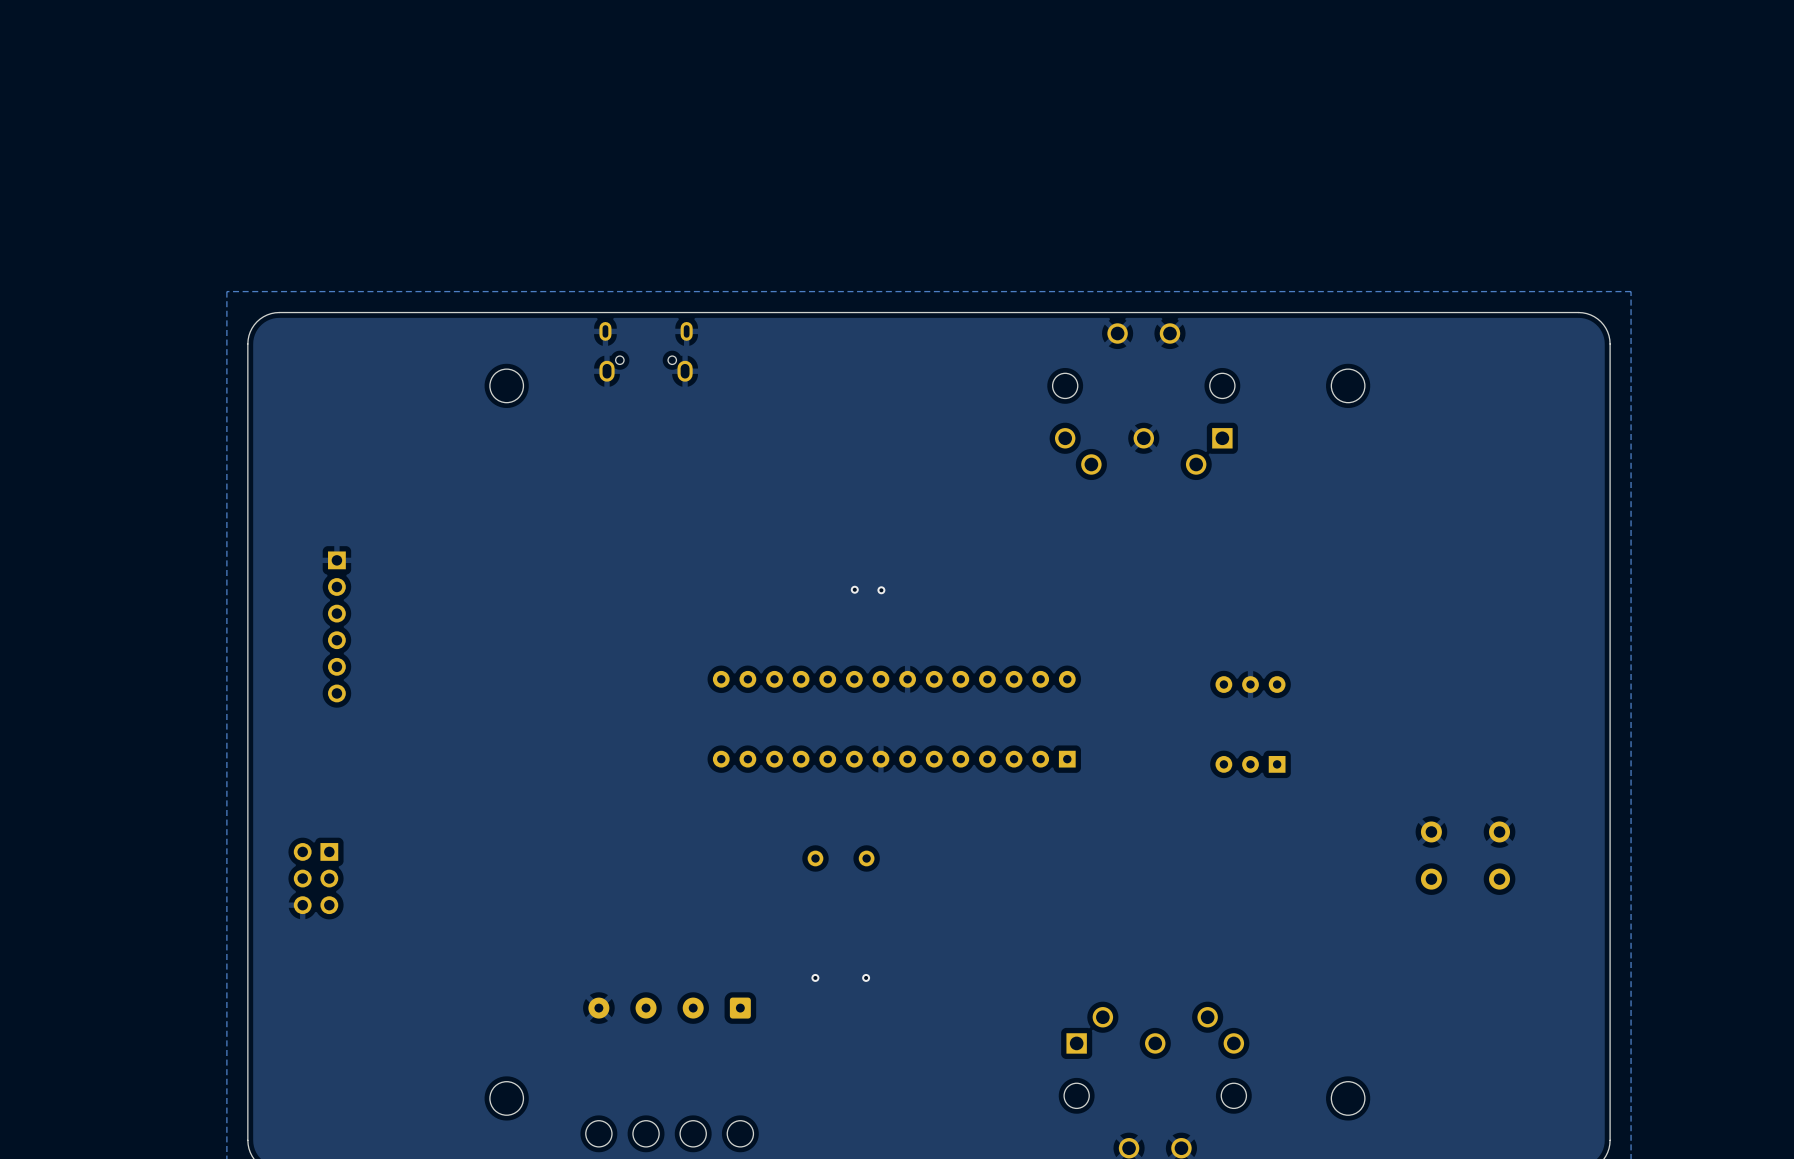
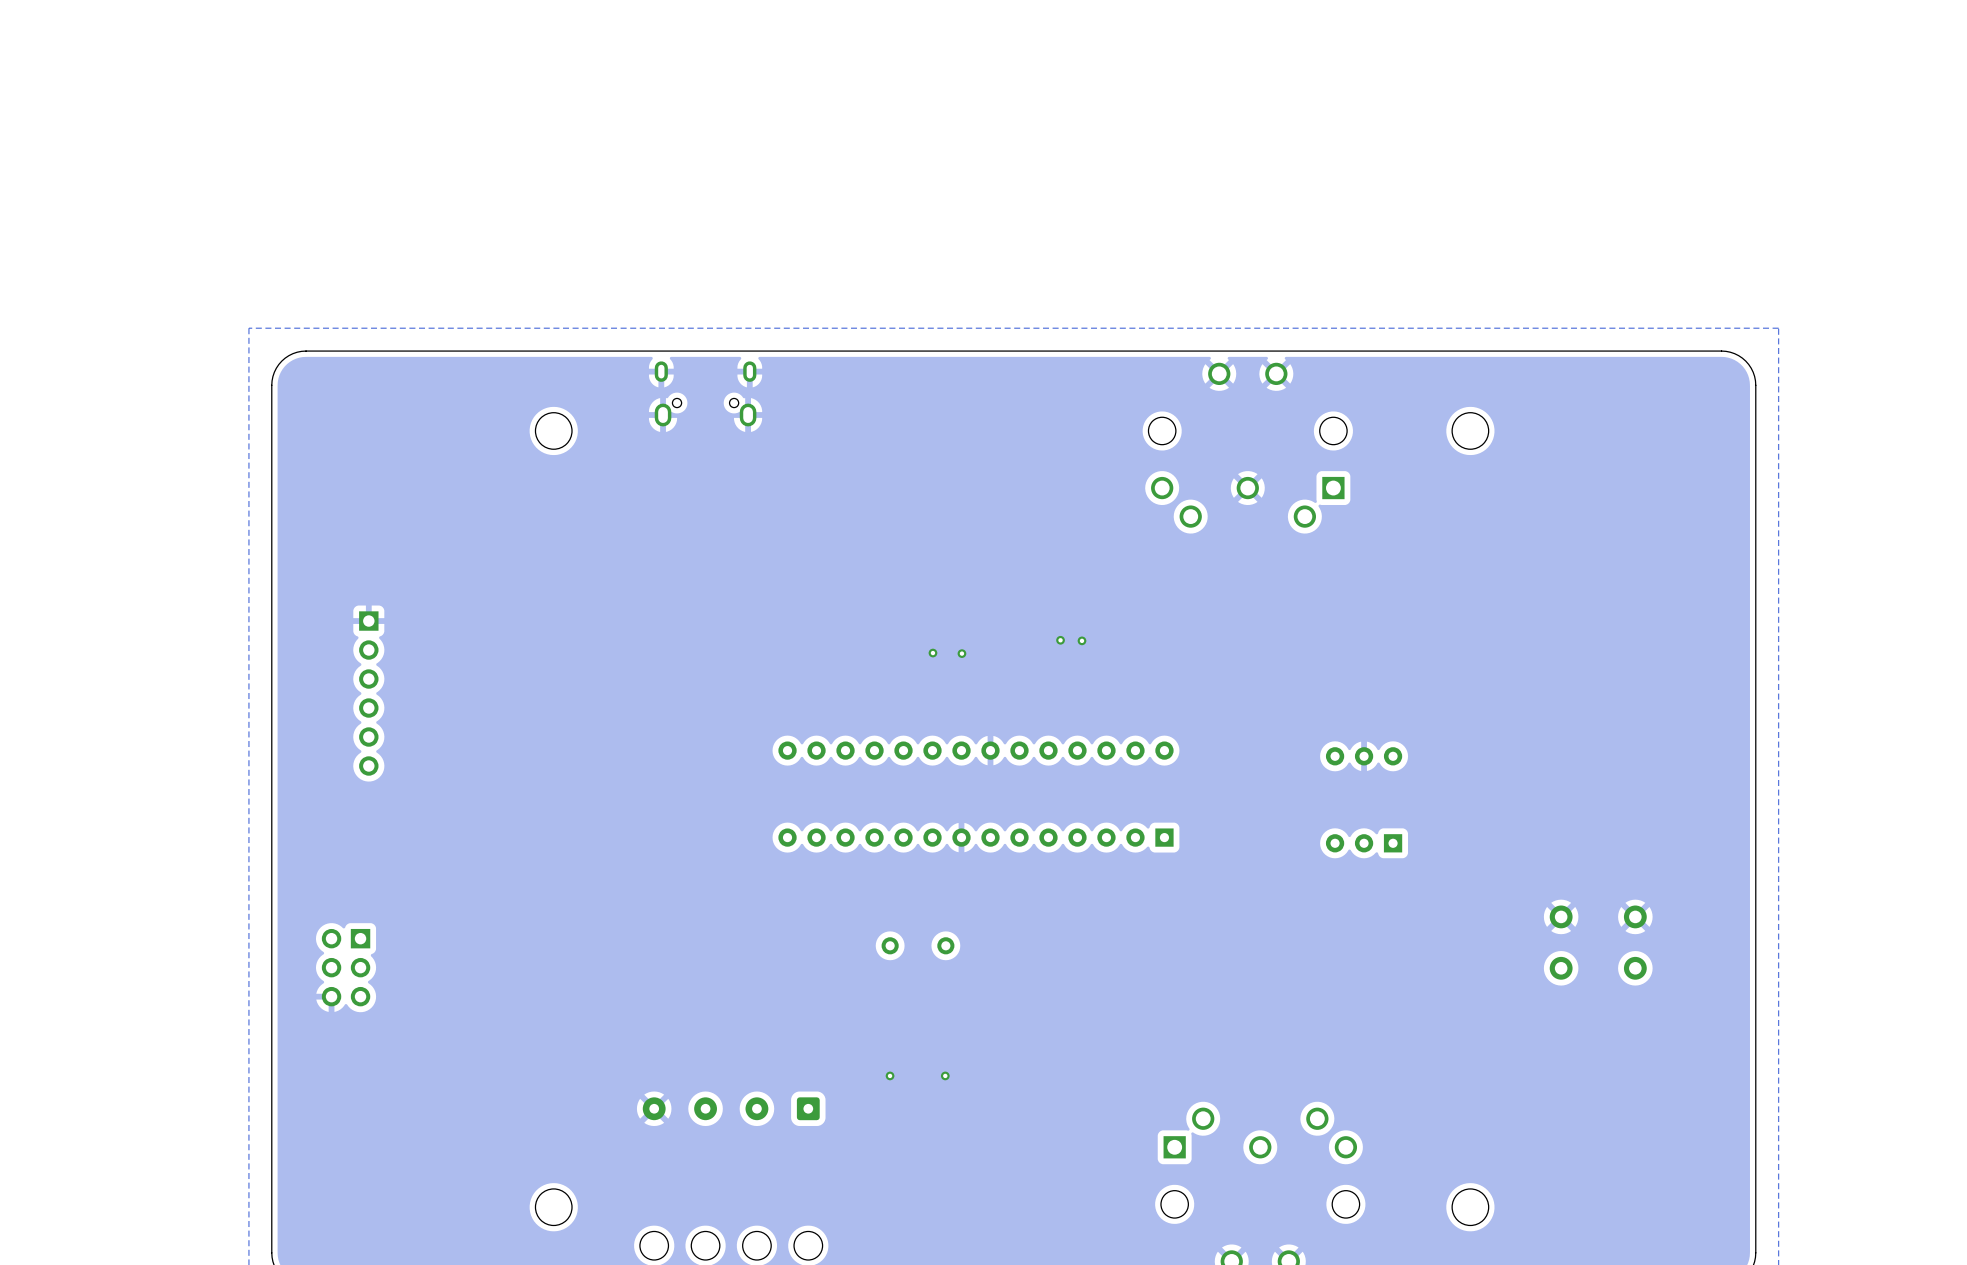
via: none -> (1060, 640)
via: none -> (1081, 640)

